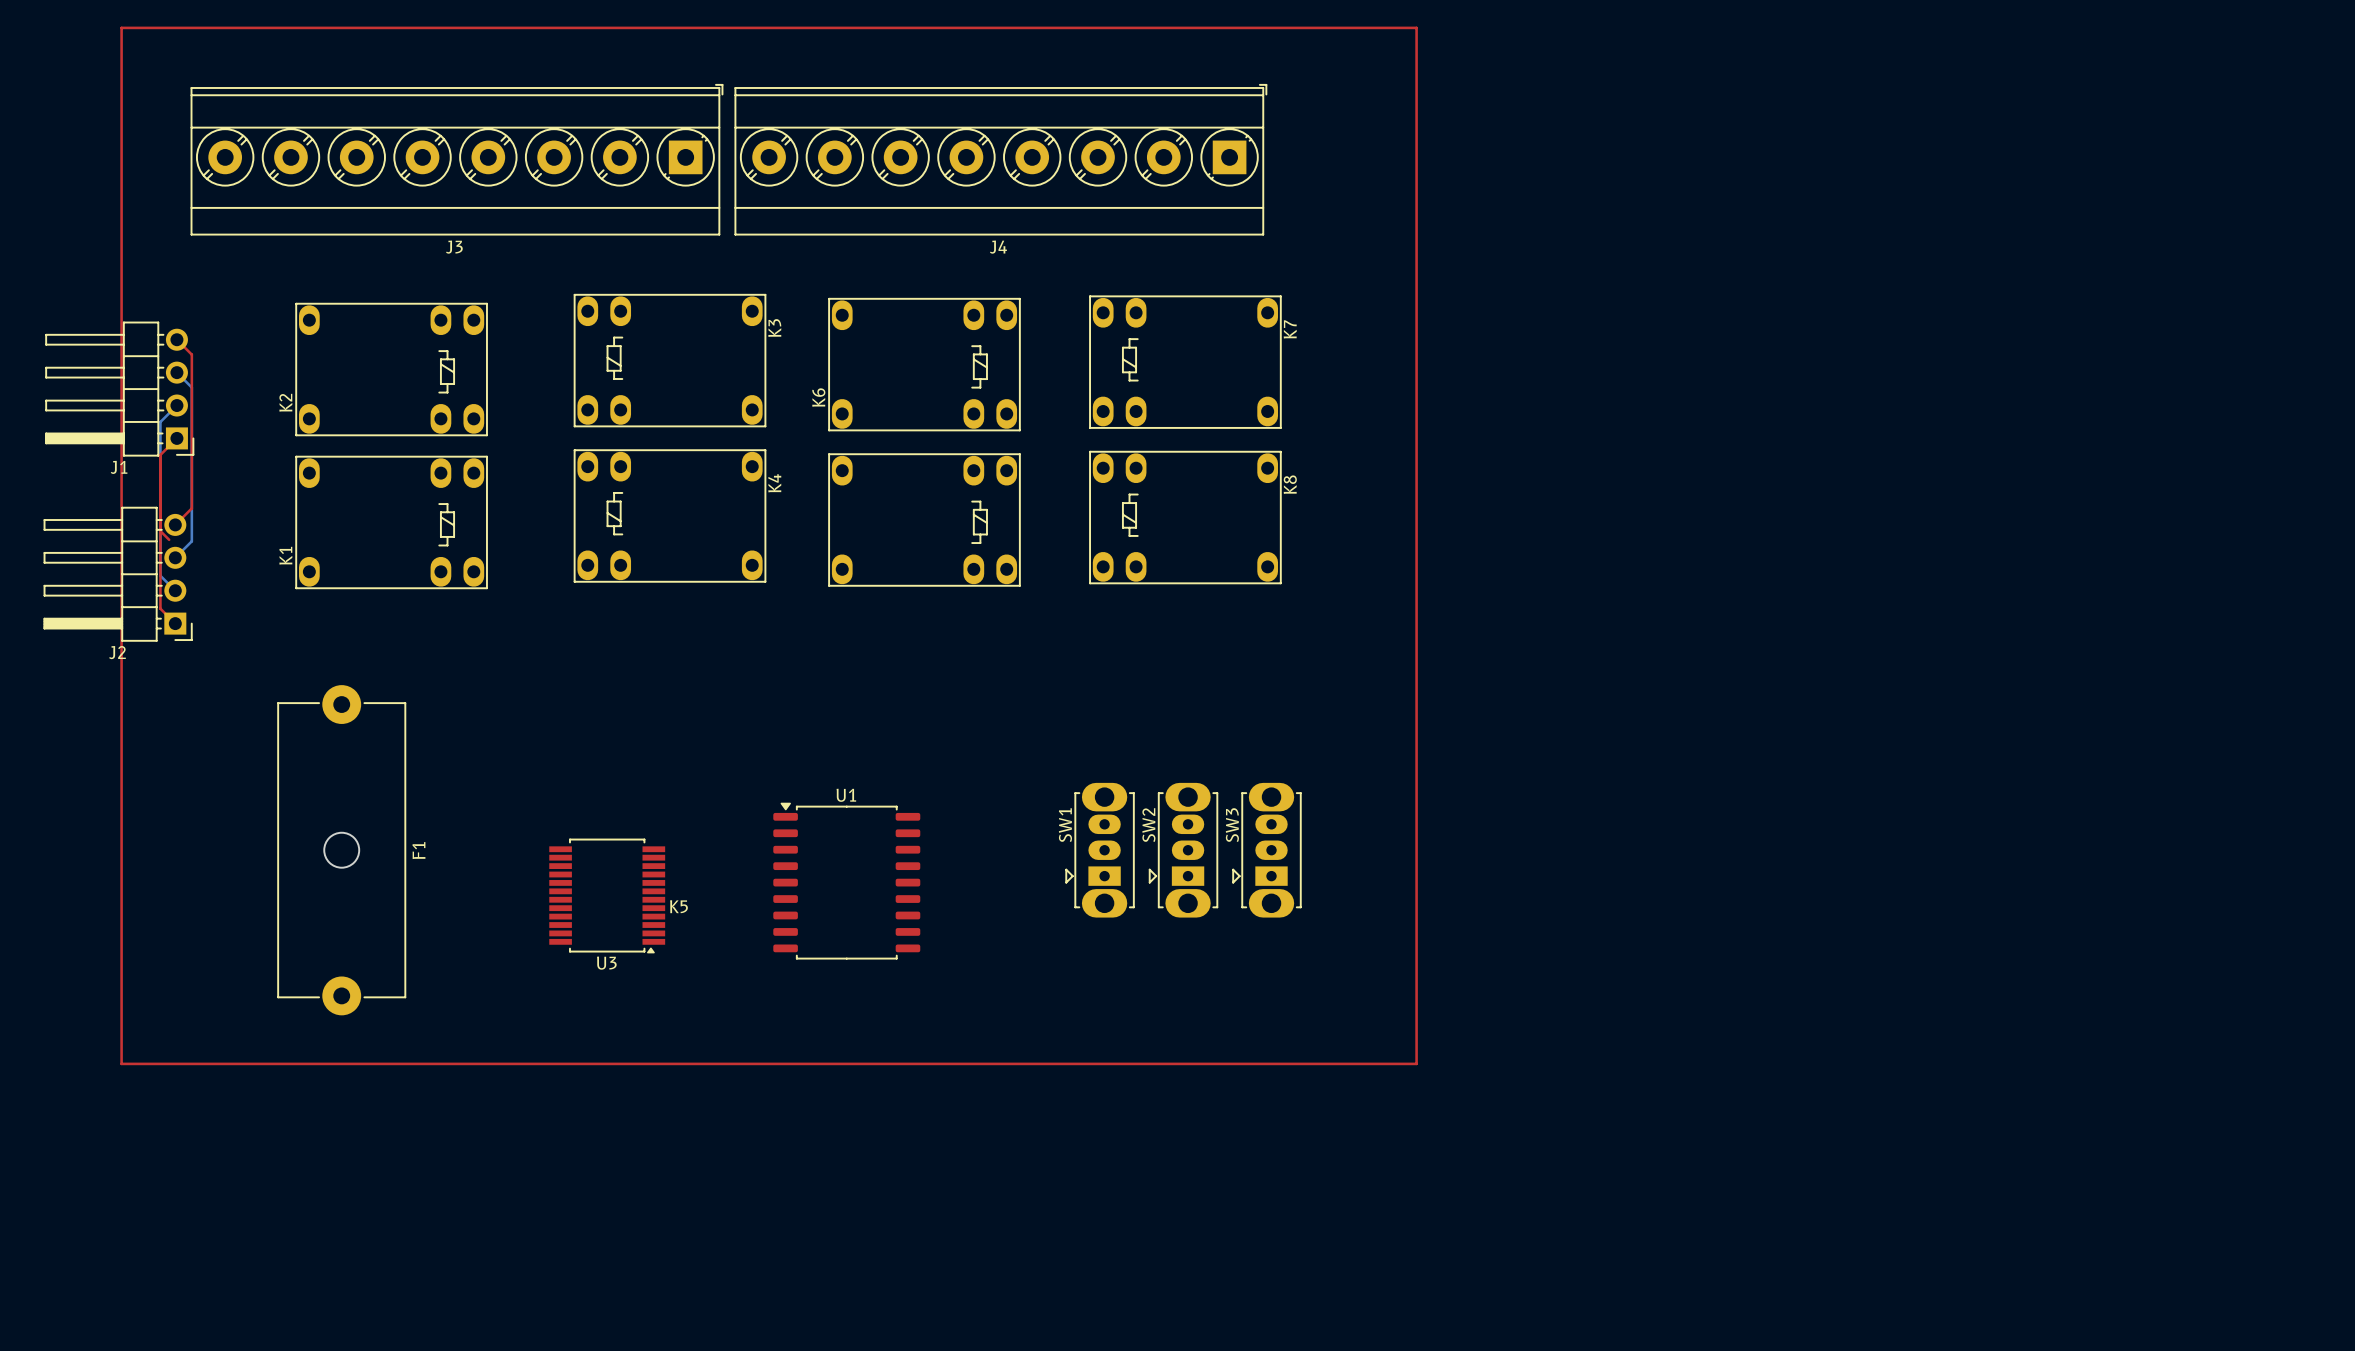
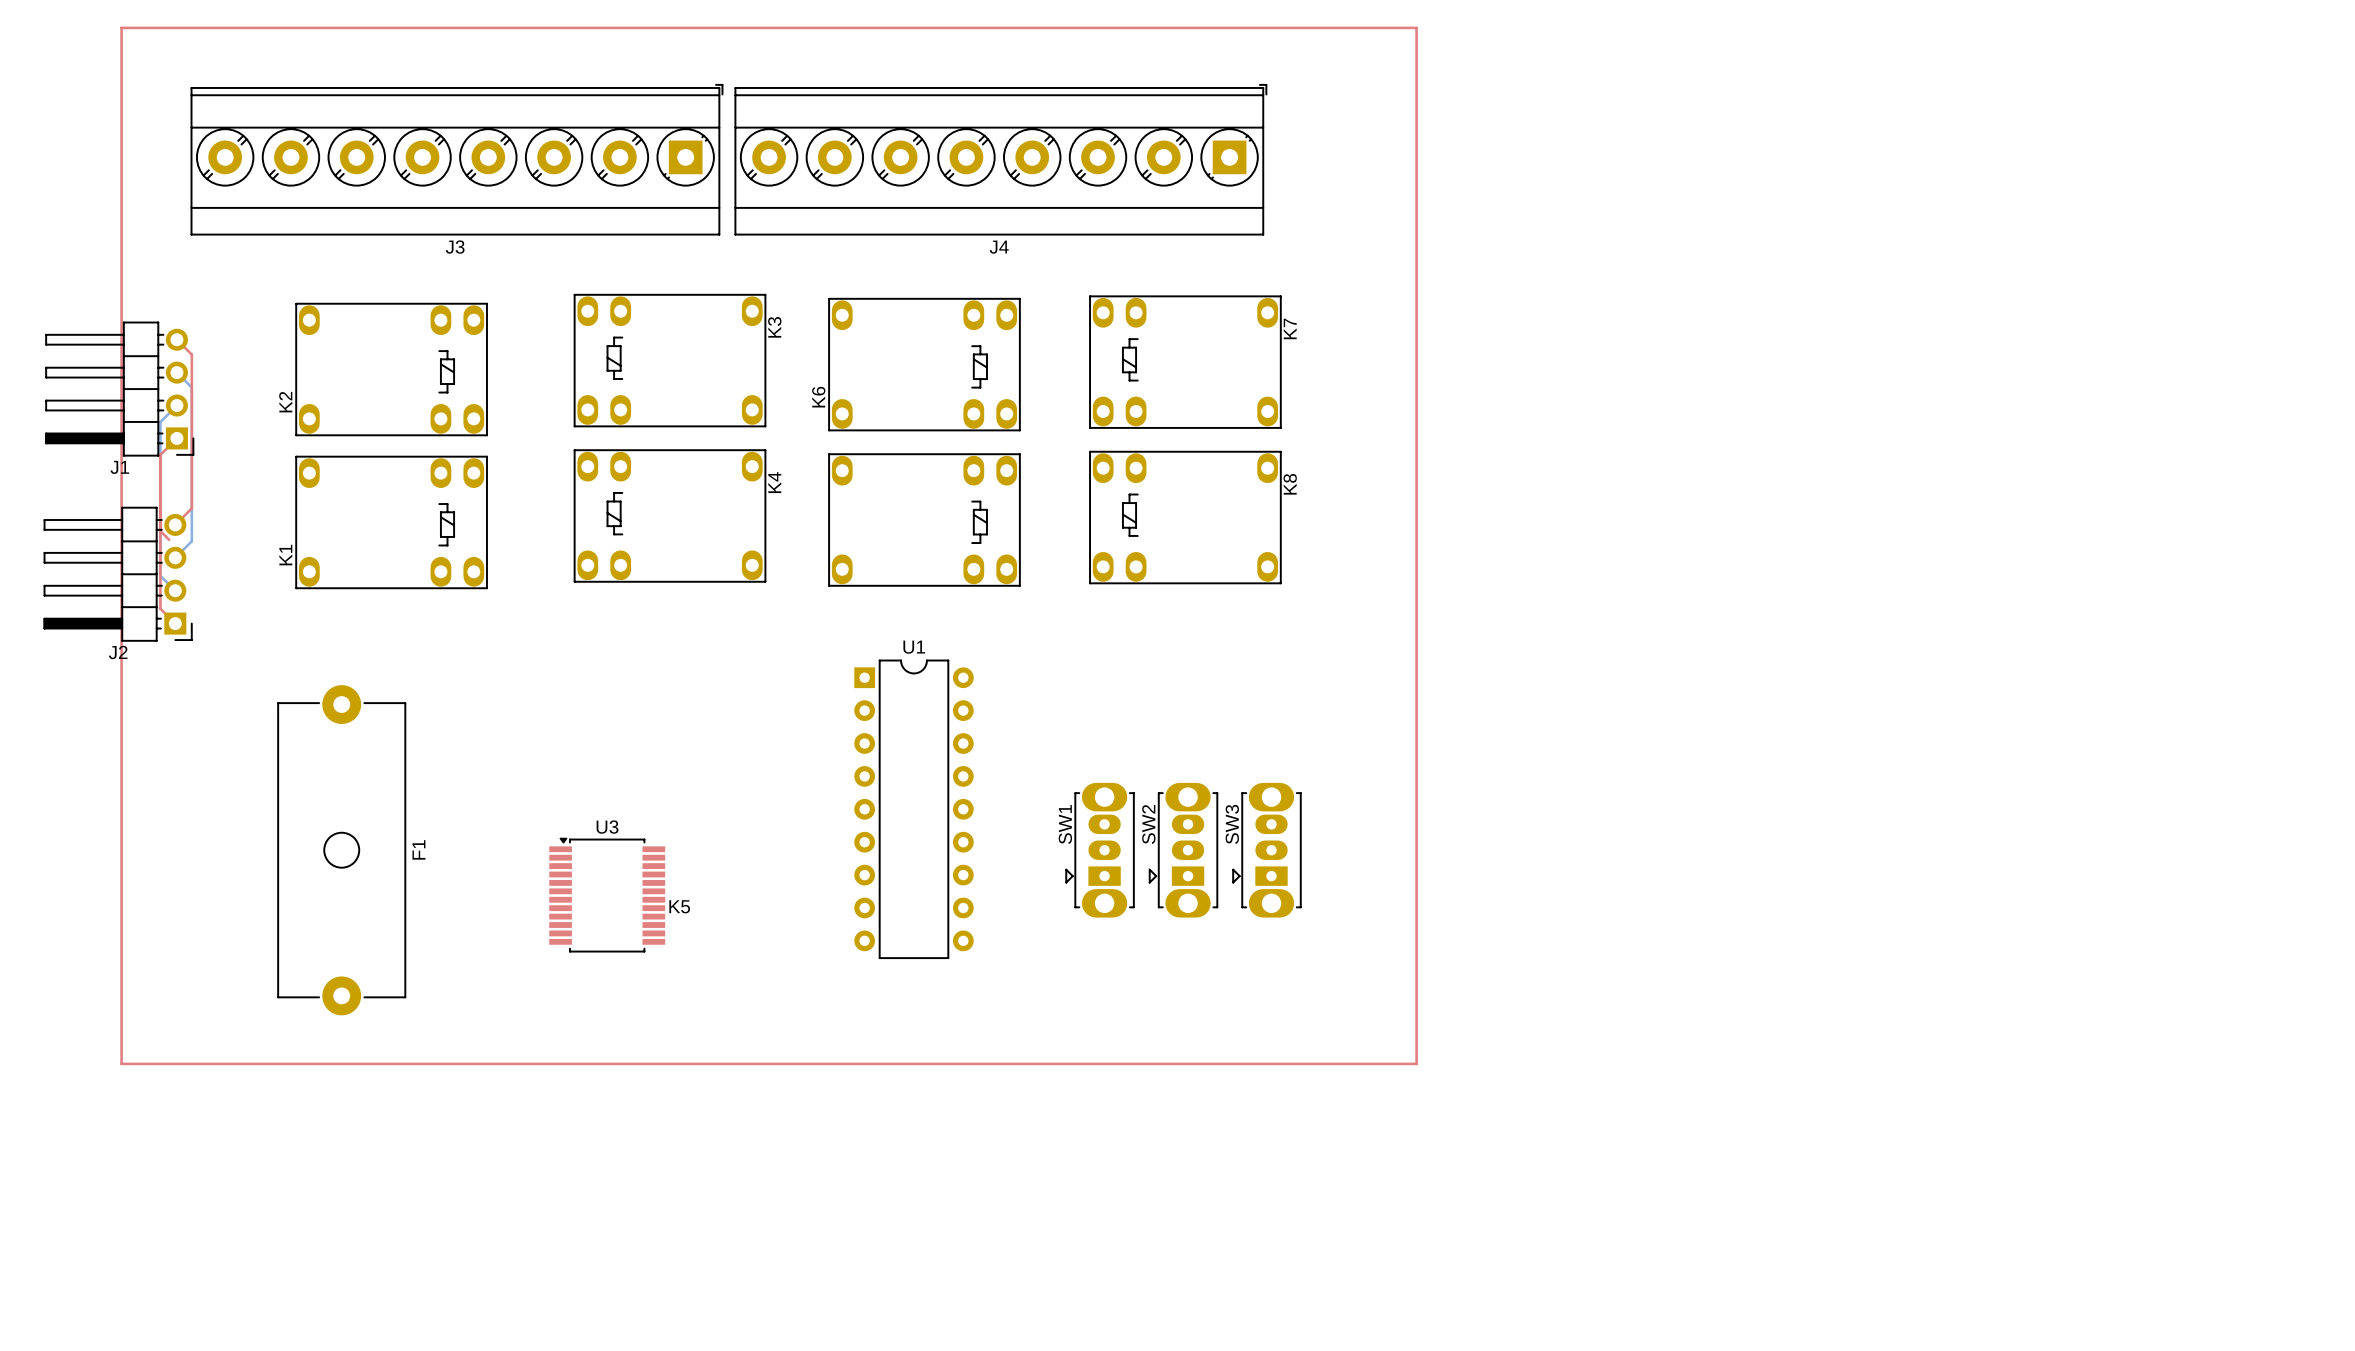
U1 name position: U1 (846, 795) -> U1 (914, 647)
U1 footprint: [773, 802, 921, 960] -> [854, 659, 974, 959]
U3 rotation: 0° (607, 895) -> 180° (607, 895)

